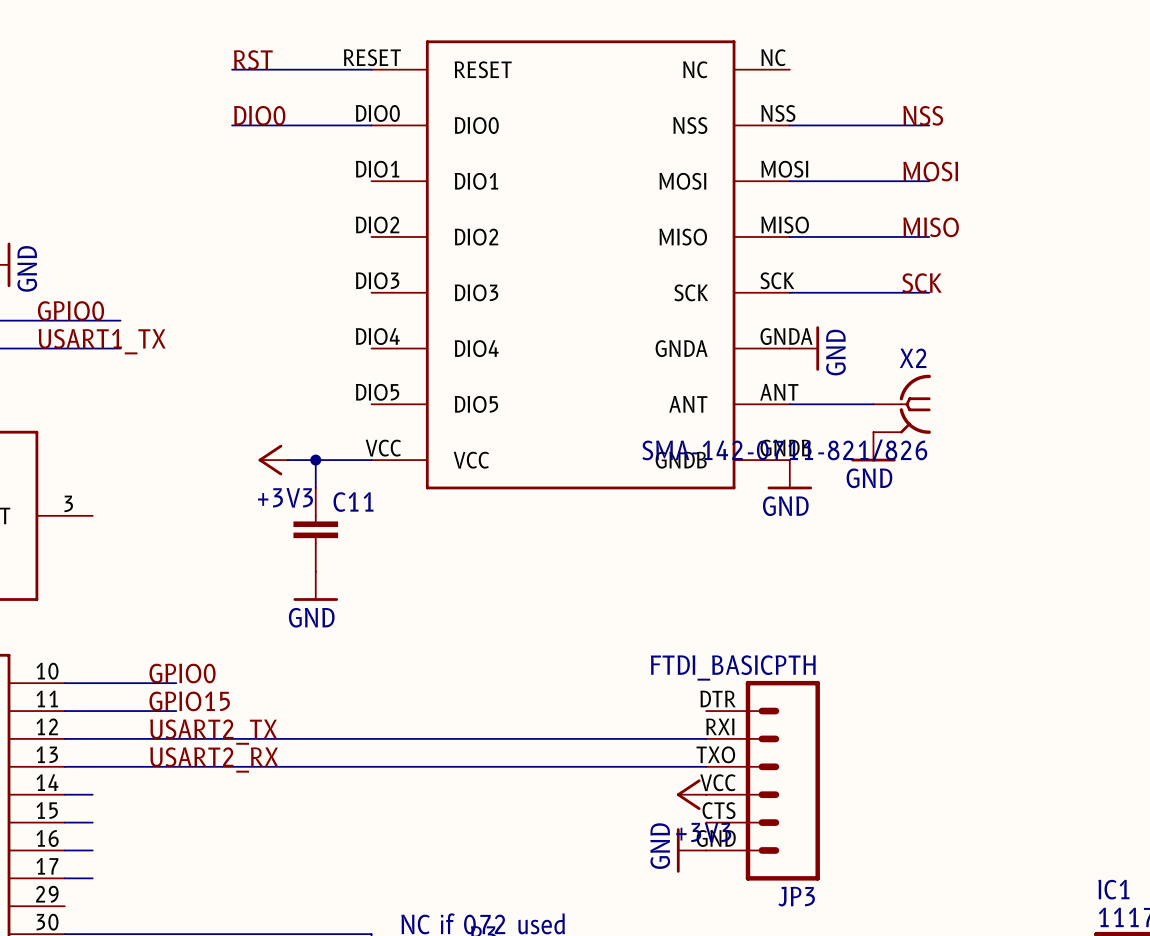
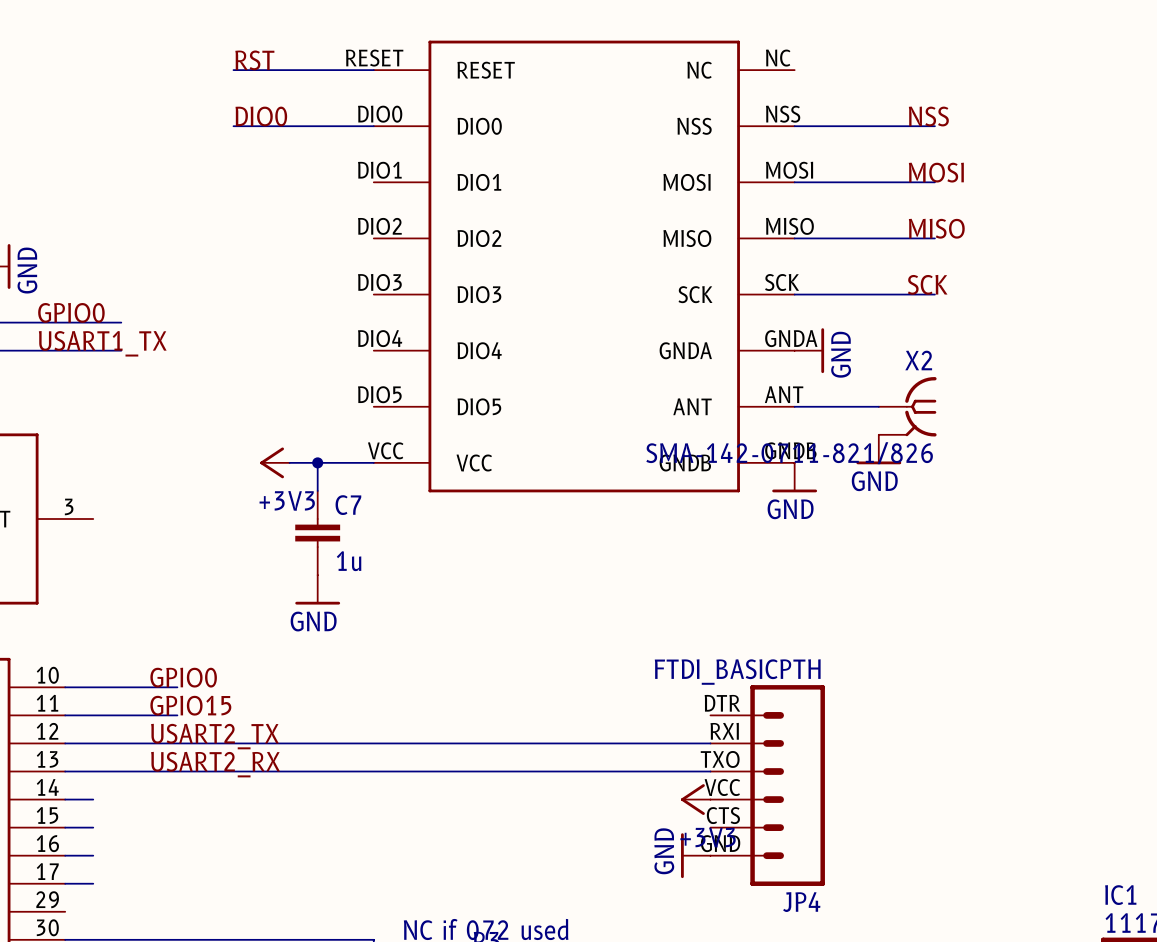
C11 name: C11 (353, 502) -> C7 (348, 505)
C11 value: none -> 1u (349, 561)
JP3 name: JP3 (796, 896) -> JP4 (801, 902)

